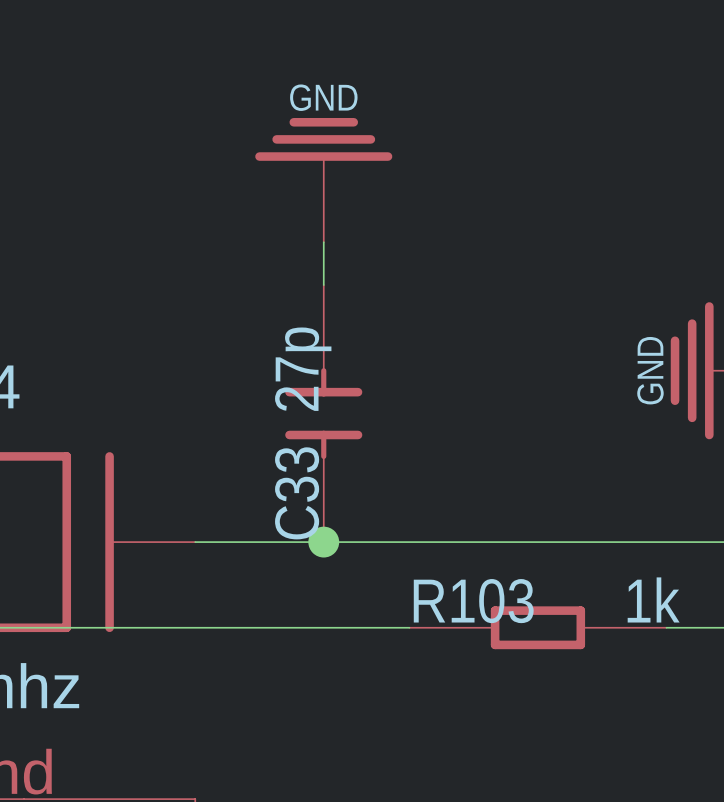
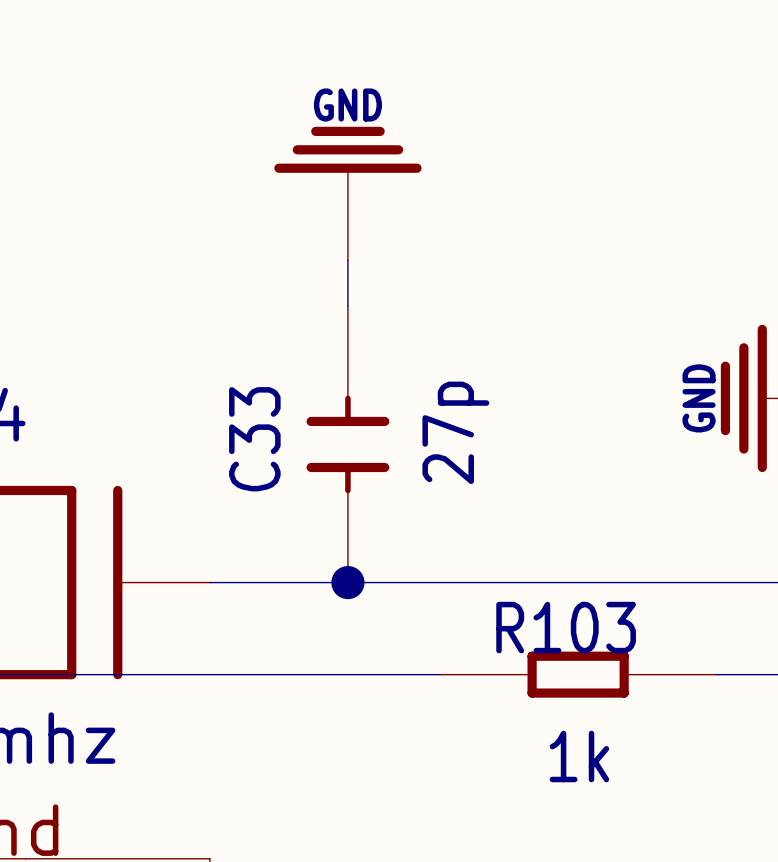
C33 value position: 27p (303, 369) -> 27p (455, 432)
C33 name position: C33 (297, 493) -> C33 (254, 439)
R103 value position: 1k (653, 599) -> 1k (579, 756)
R103 name position: R103 (473, 601) -> R103 (566, 627)

